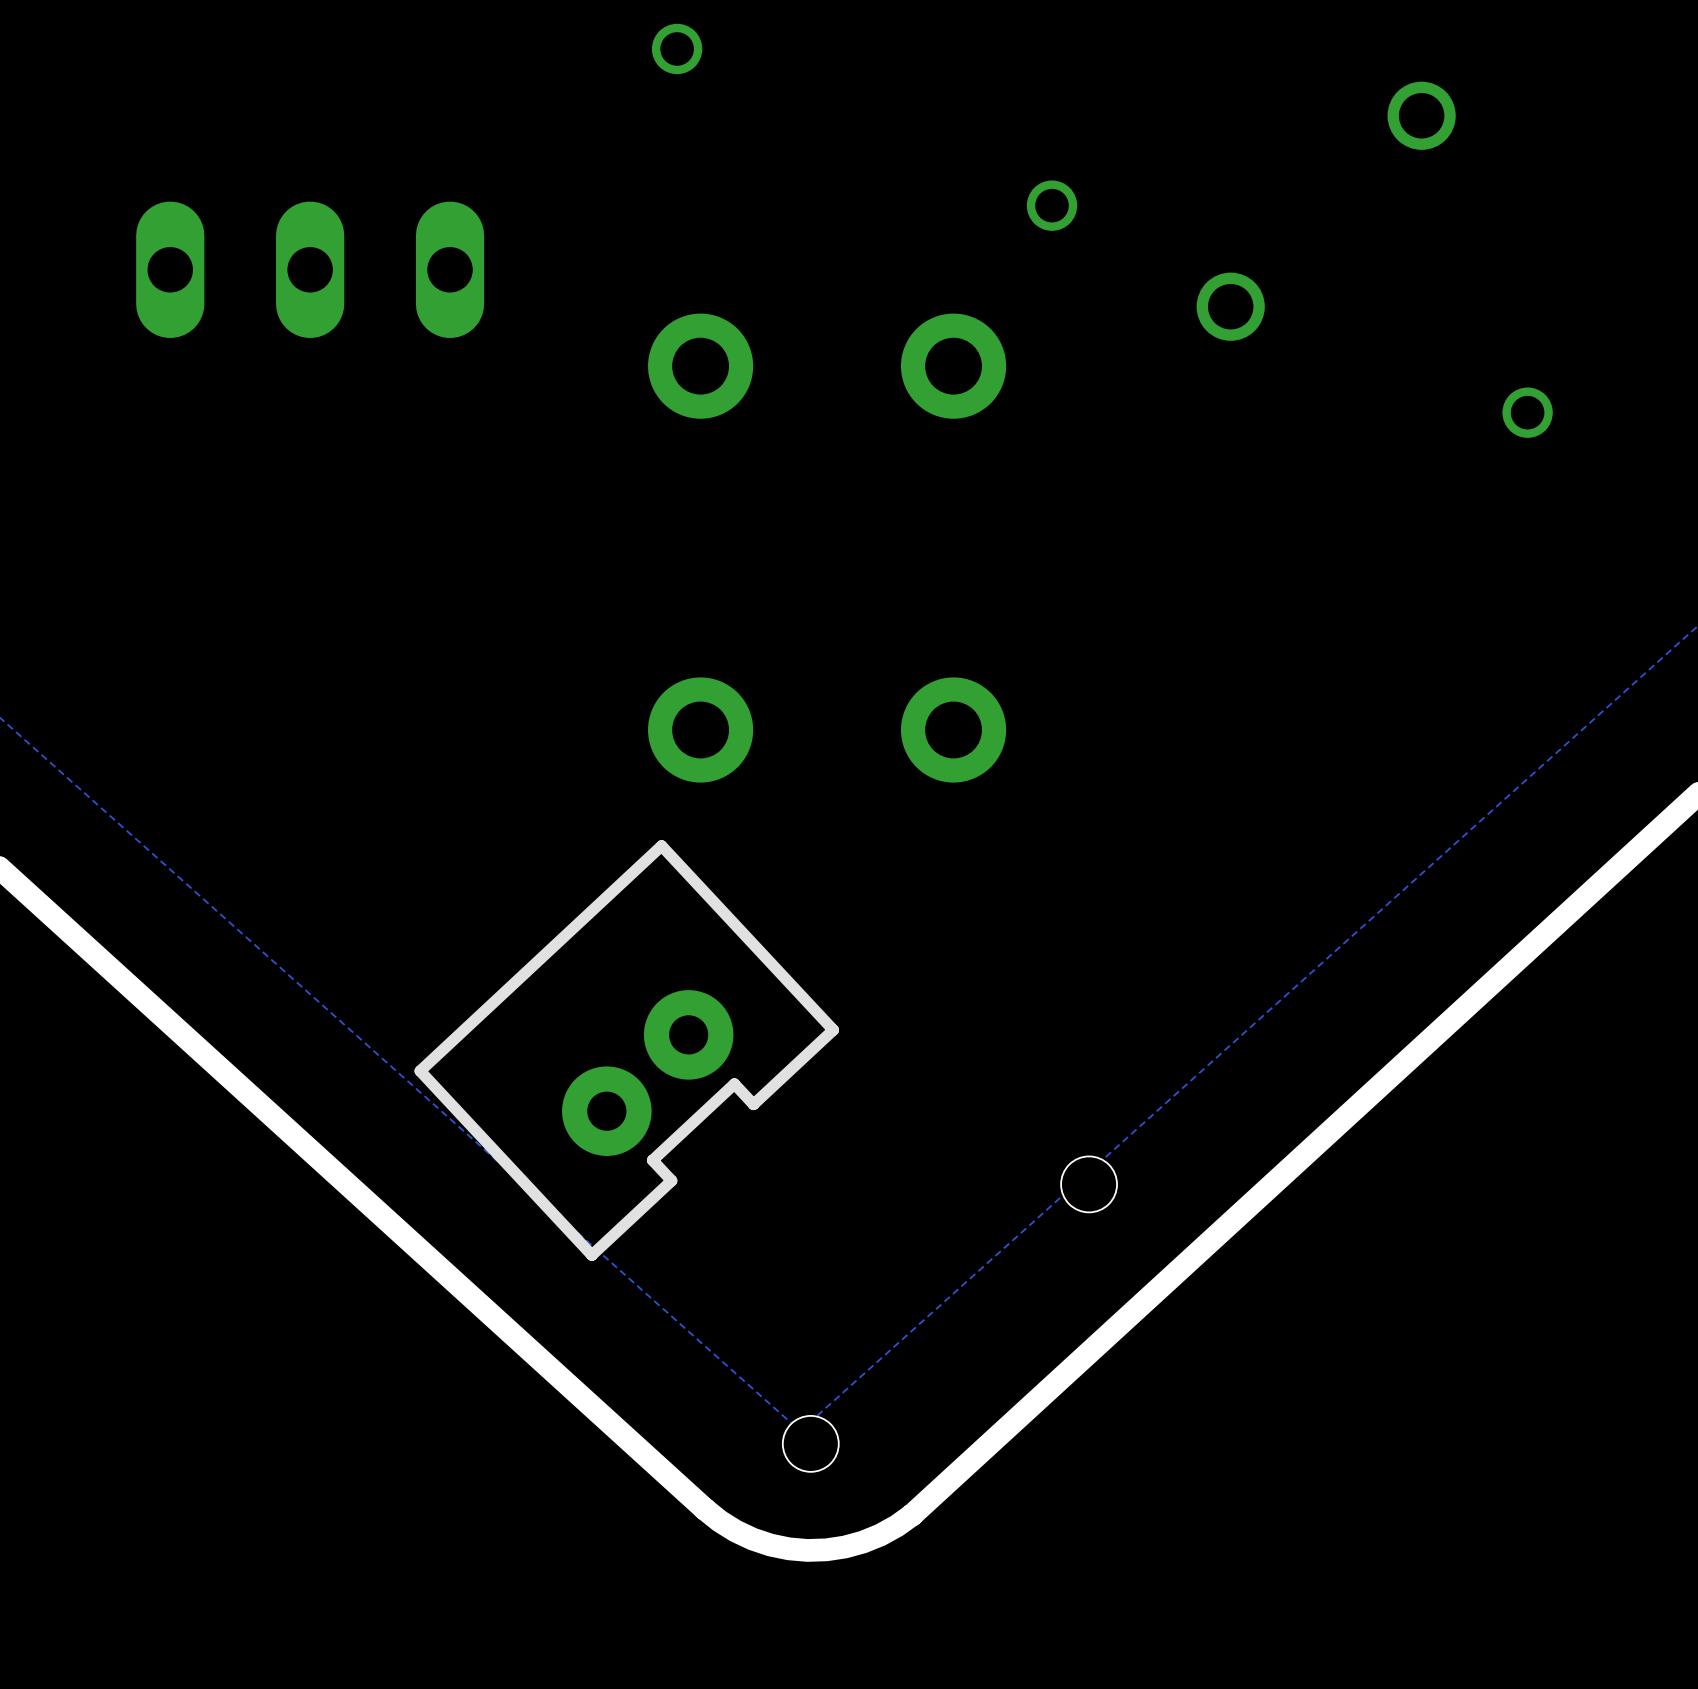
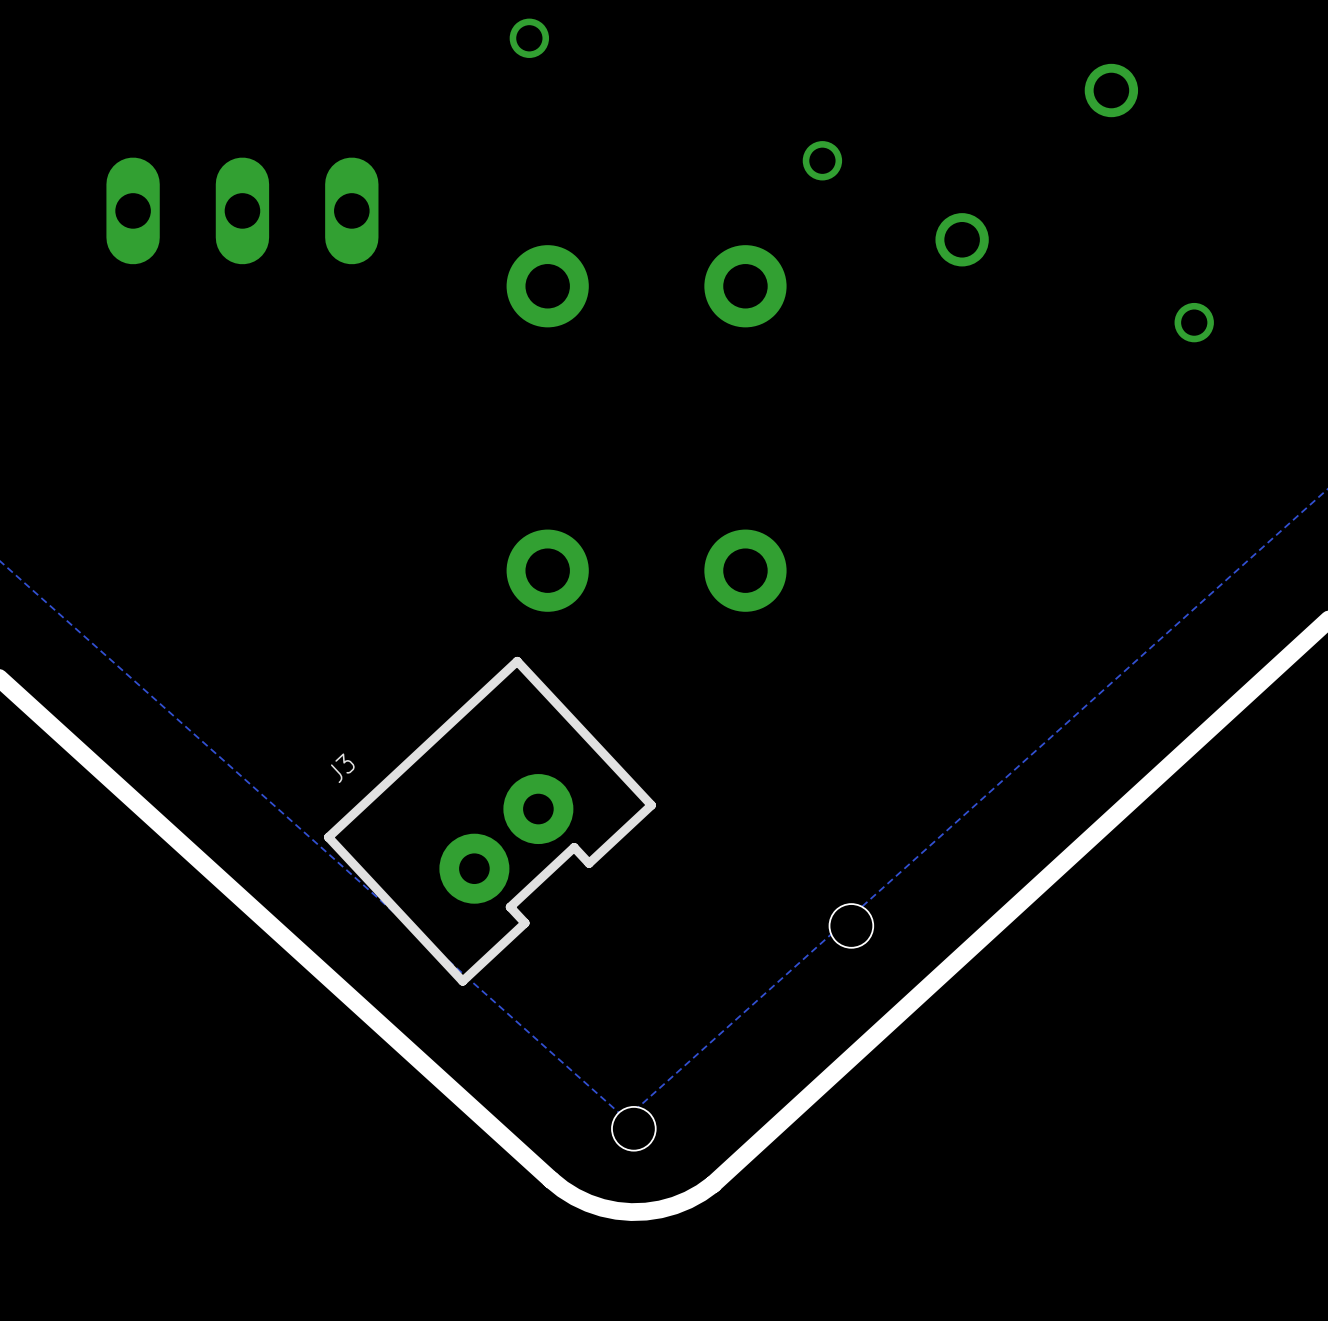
J3 name: none -> J3 (342, 768)

